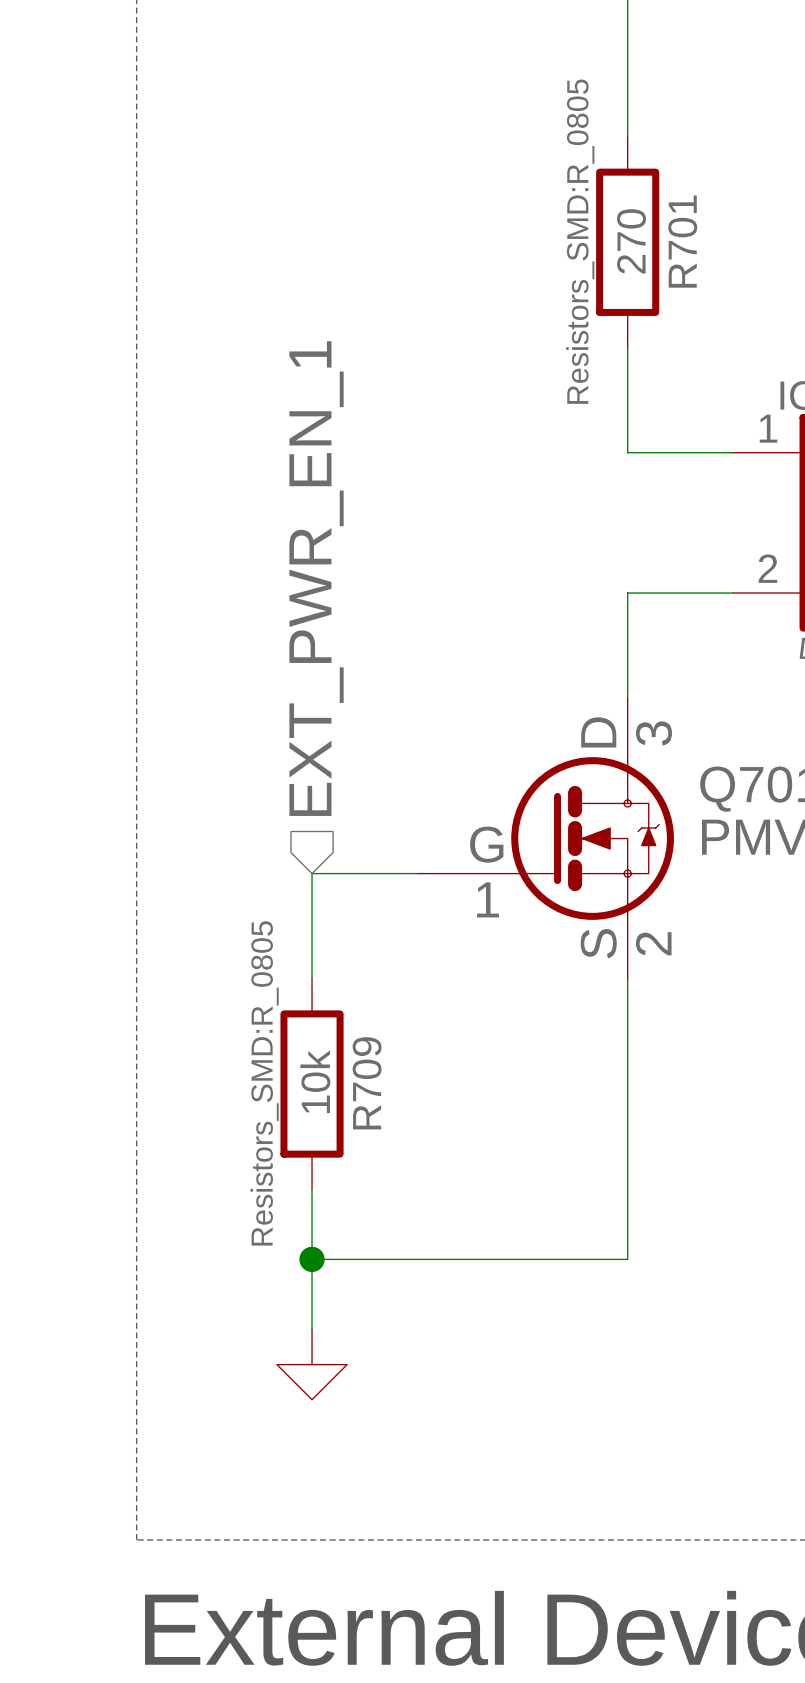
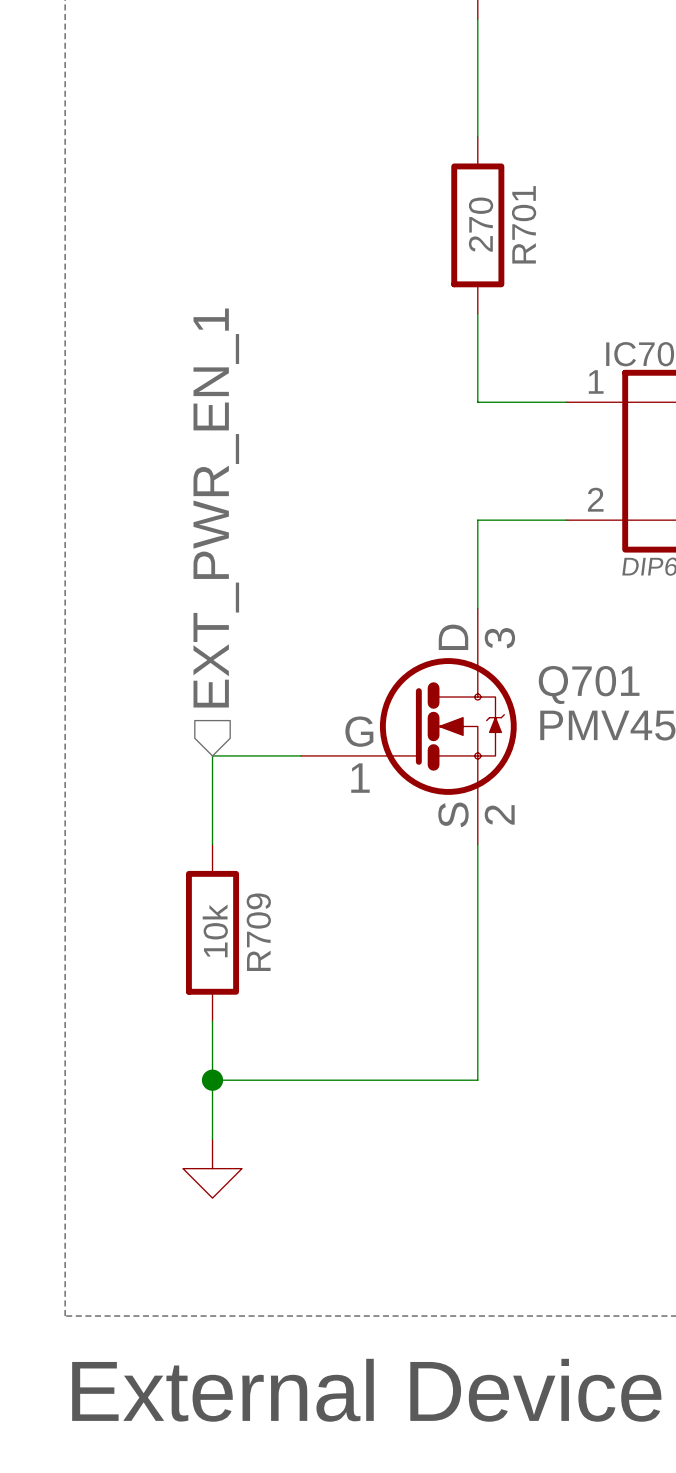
R701 text: Resistors_SMD:R_0805 (580, 241) -> none
R709 text: Resistors_SMD:R_0805 (264, 1083) -> none

